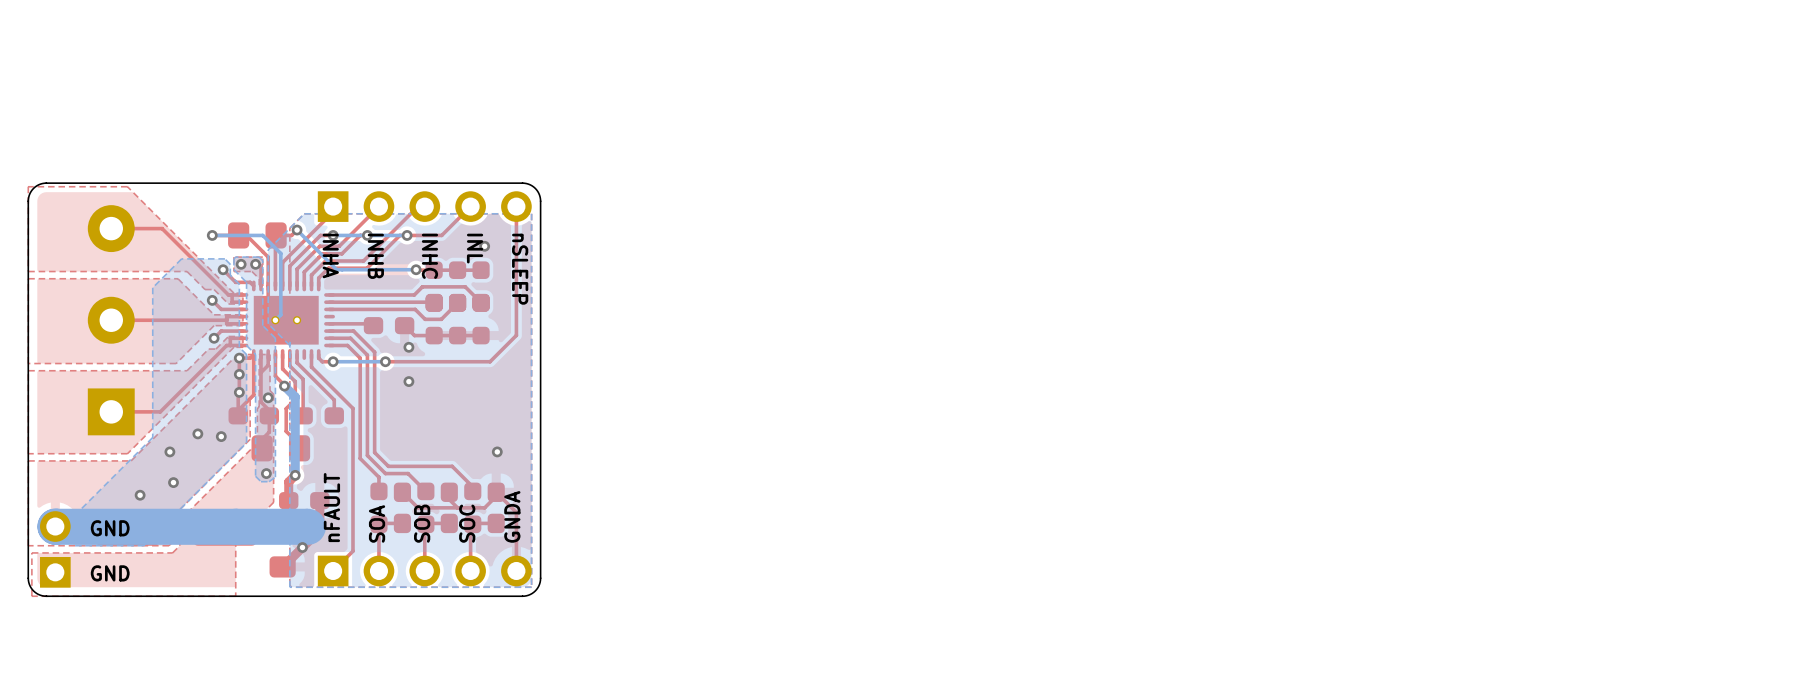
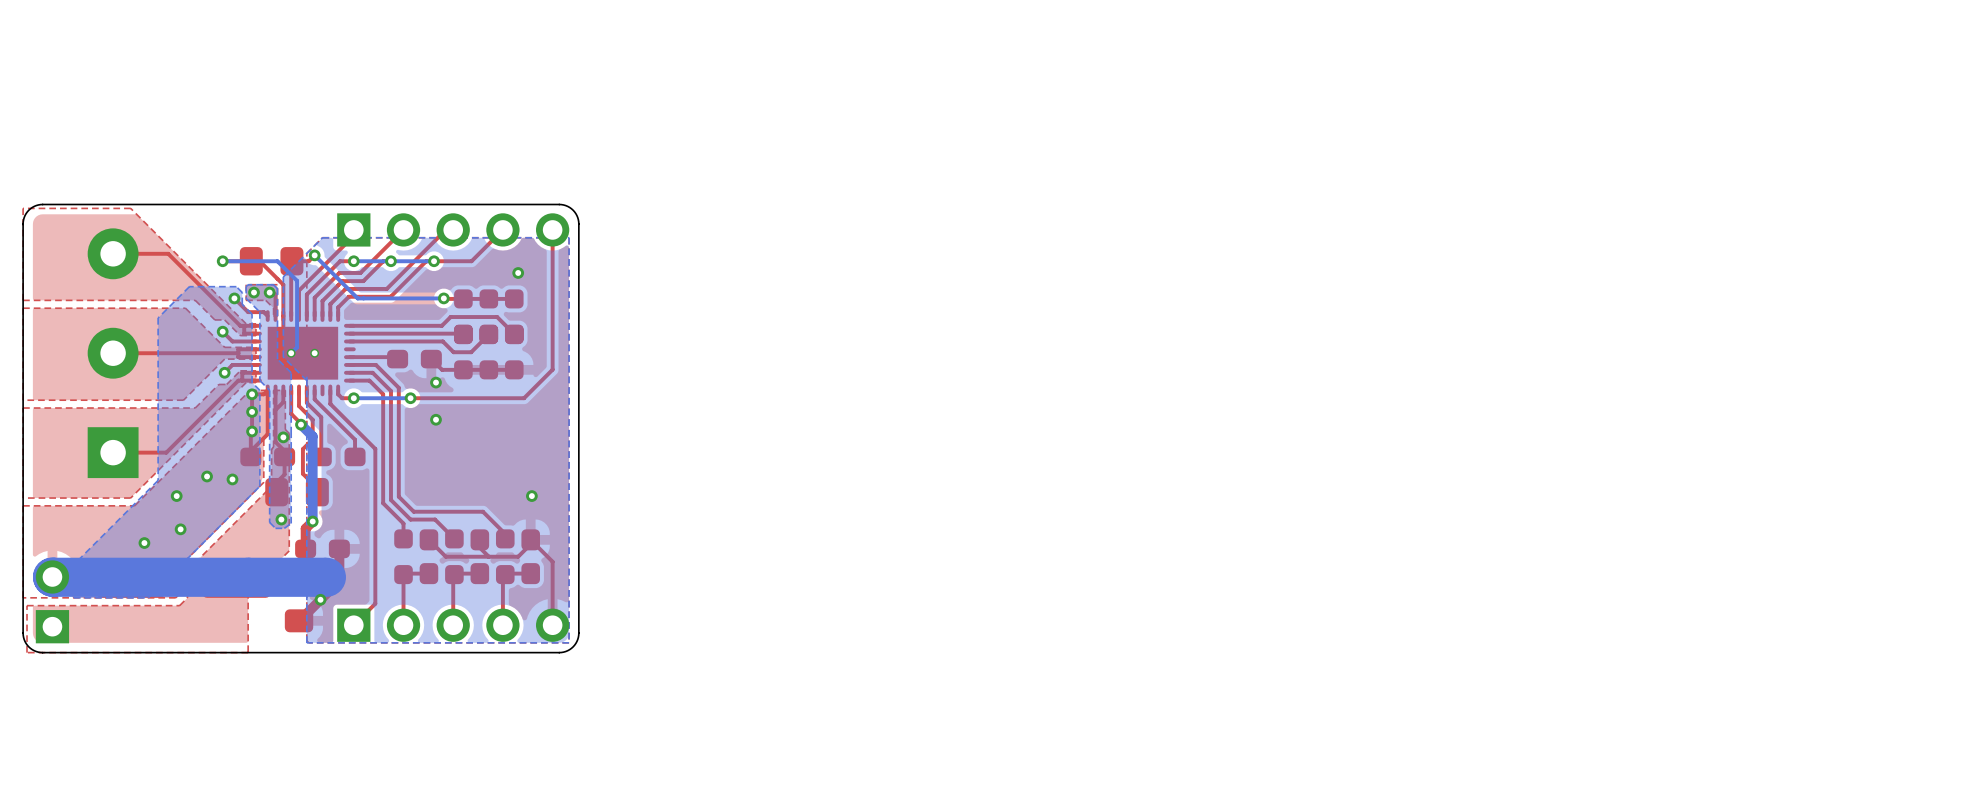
text: INL (475, 248) -> none
text: INHA (330, 255) -> none
text: INHB (375, 256) -> none
text: INHC (429, 256) -> none
text: nSLEEP (520, 269) -> none
text: nFAULT (331, 507) -> none
text: GNDA (512, 516) -> none
text: SOA (377, 523) -> none
text: SOB (422, 523) -> none
text: SOC (467, 523) -> none
text: GND (110, 528) -> none
text: GND (110, 573) -> none

